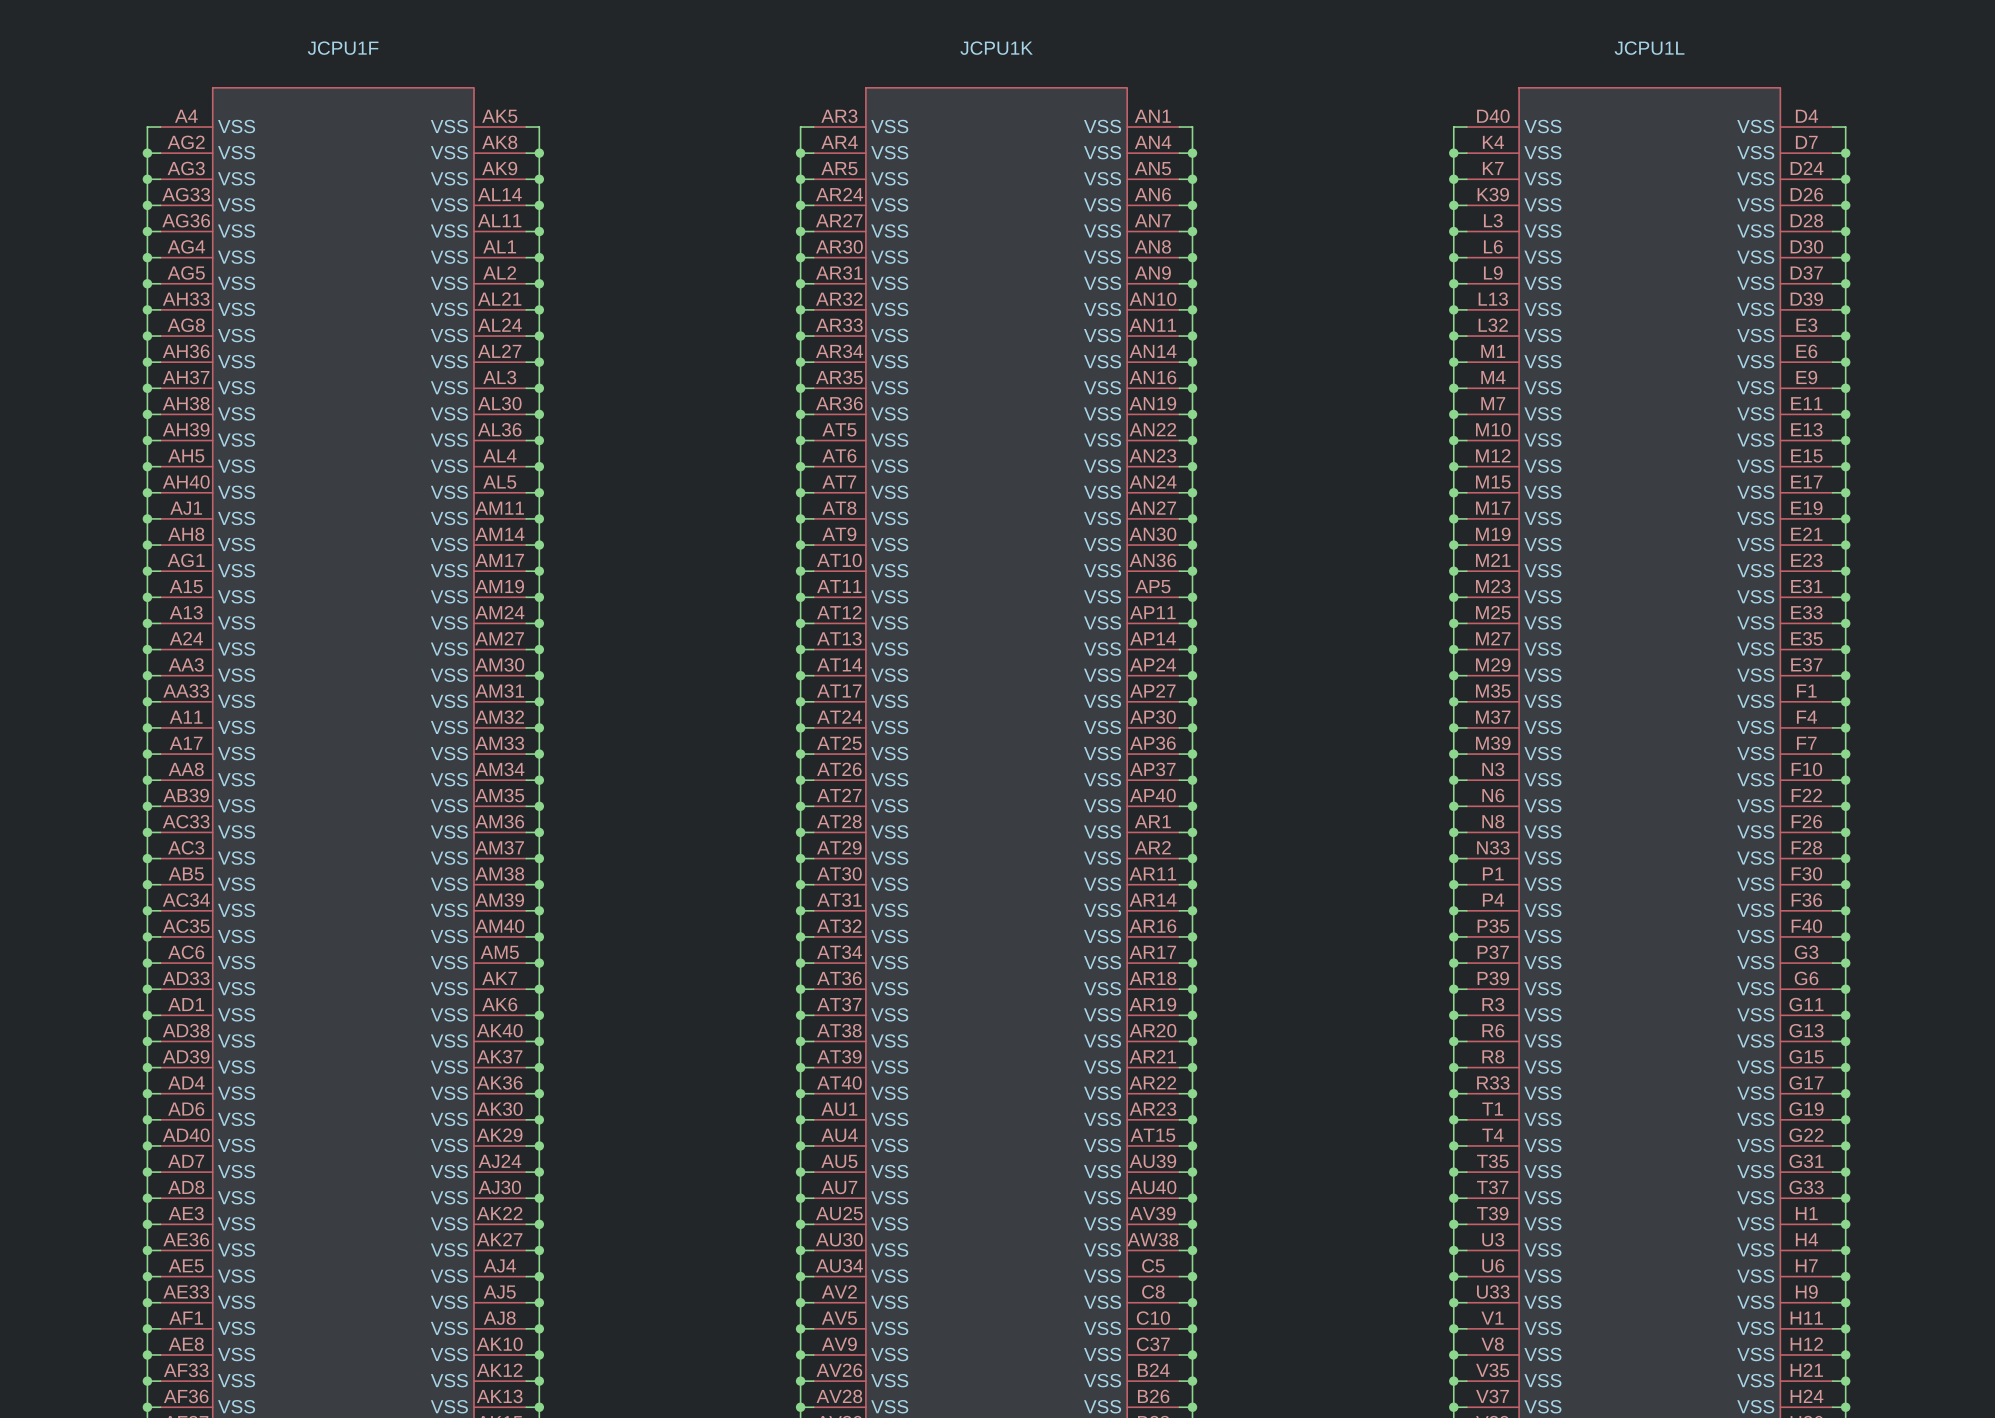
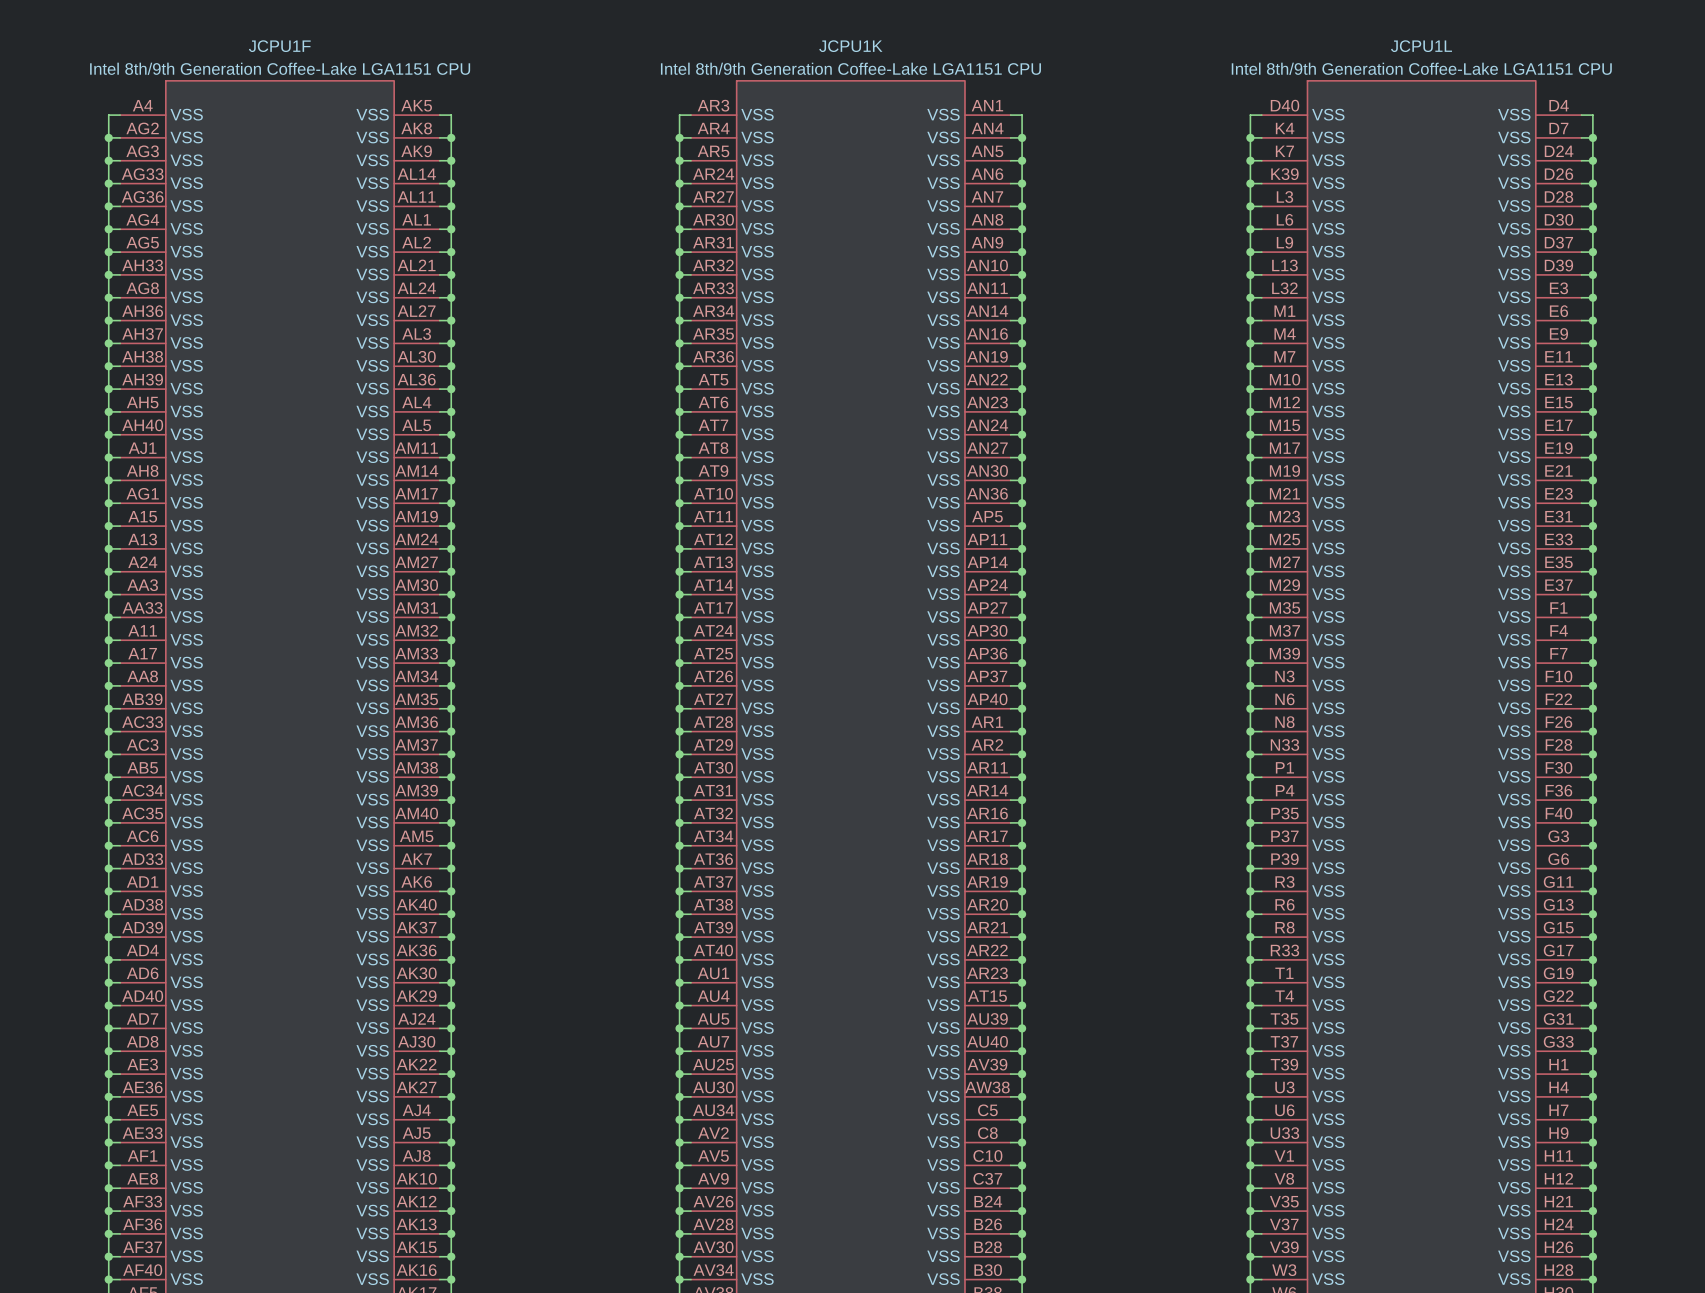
JCPU1F value: none -> Intel 8th/9th Generation Coffee-Lake LGA1151 CPU (280, 68)
JCPU1K value: none -> Intel 8th/9th Generation Coffee-Lake LGA1151 CPU (850, 68)
JCPU1L value: none -> Intel 8th/9th Generation Coffee-Lake LGA1151 CPU (1421, 68)

